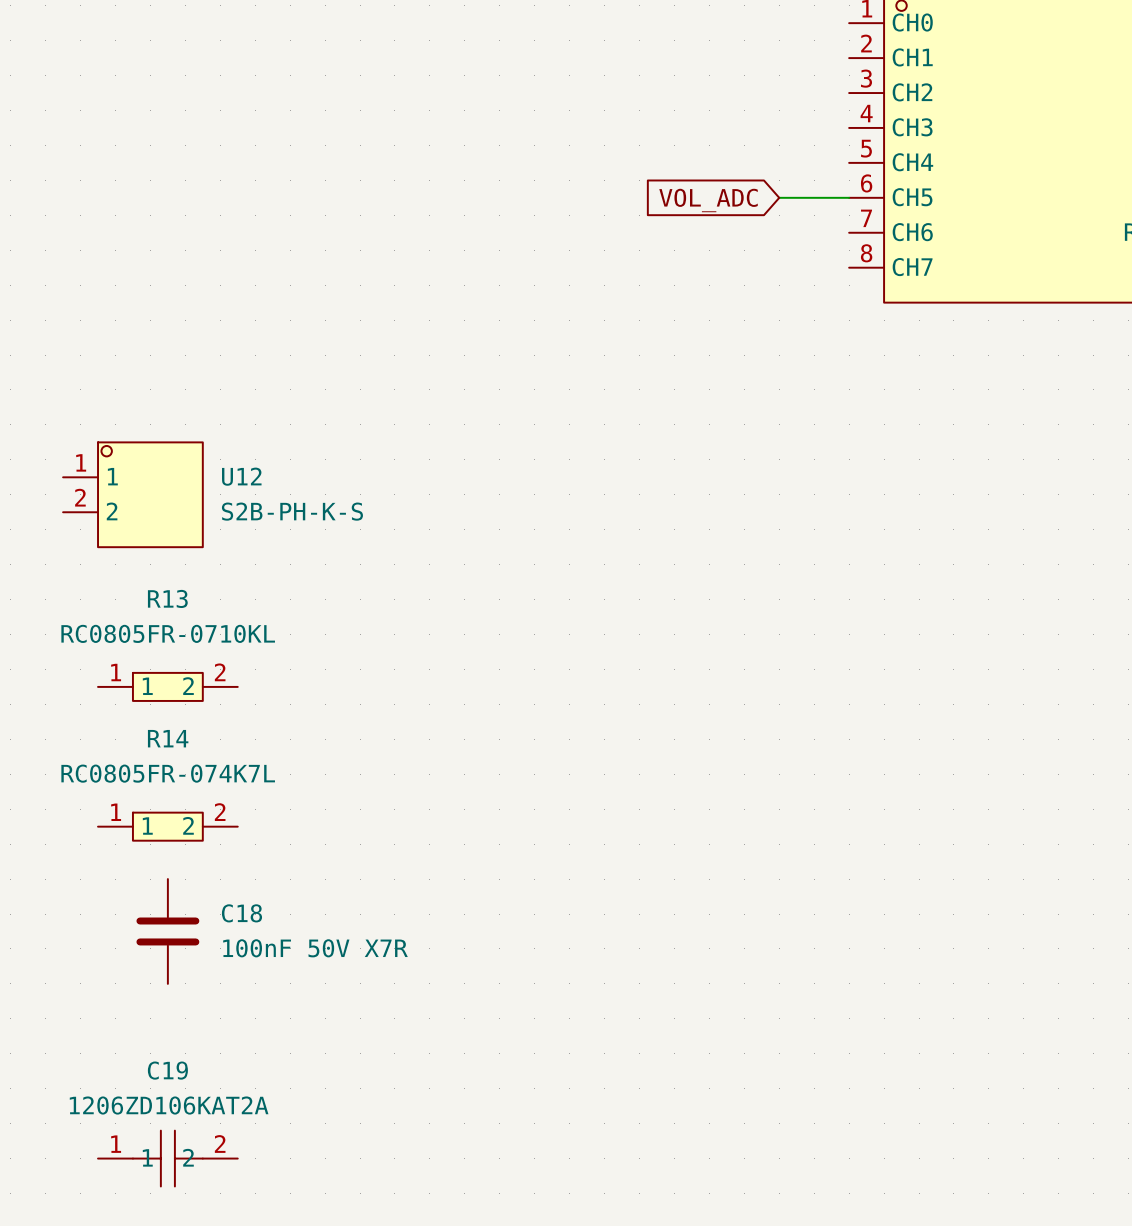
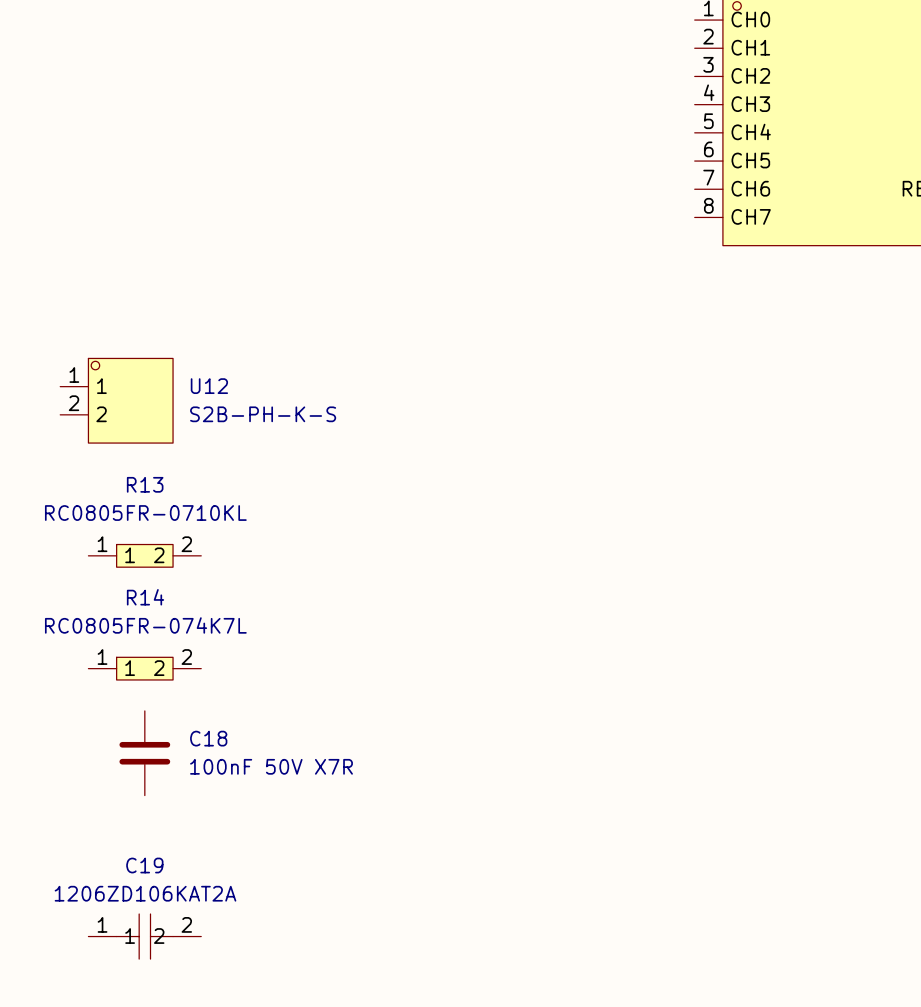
wire: (779, 197) (849, 197) -> none
global label: VOL_ADC (708, 200) -> none

